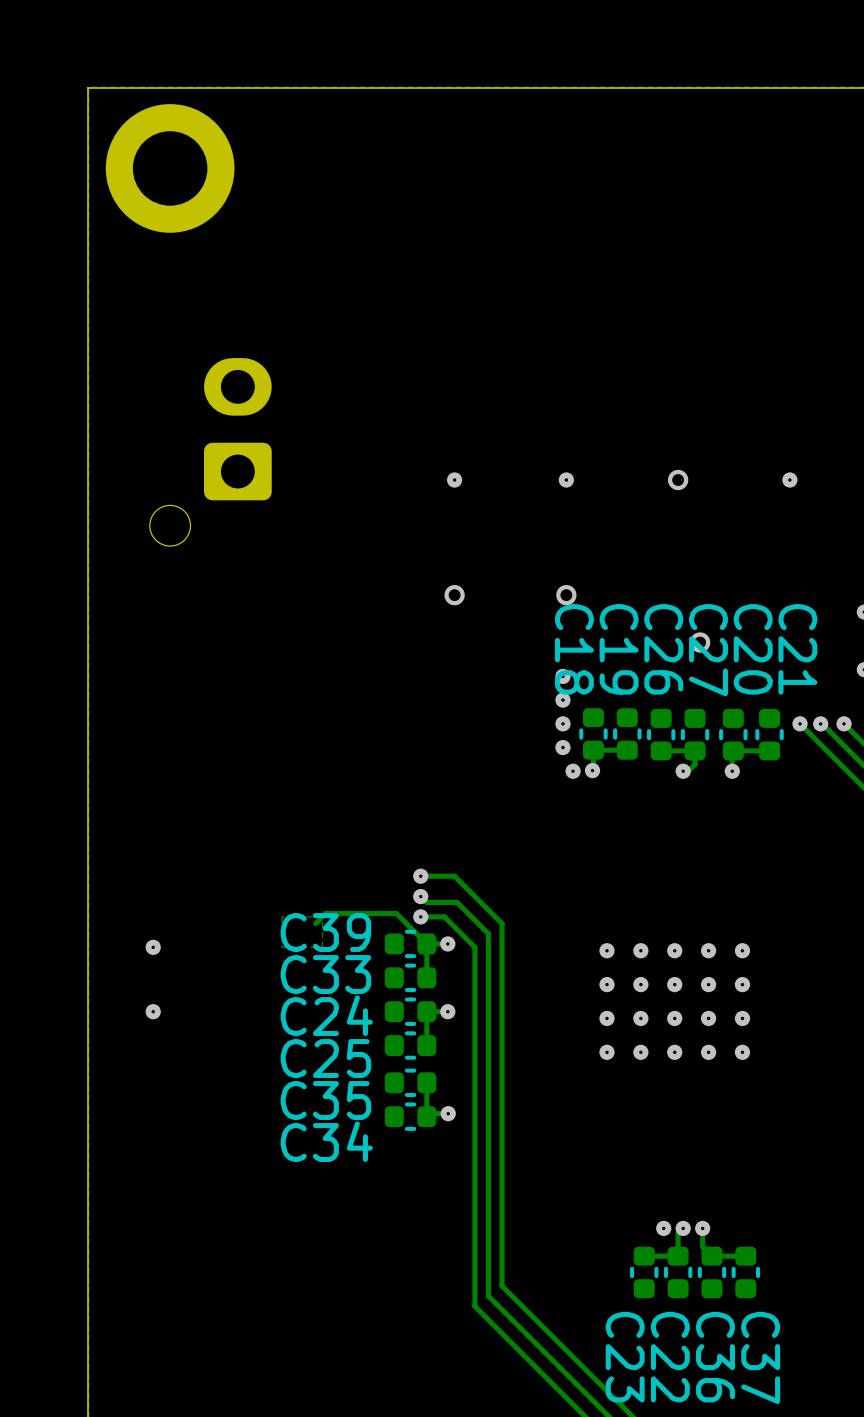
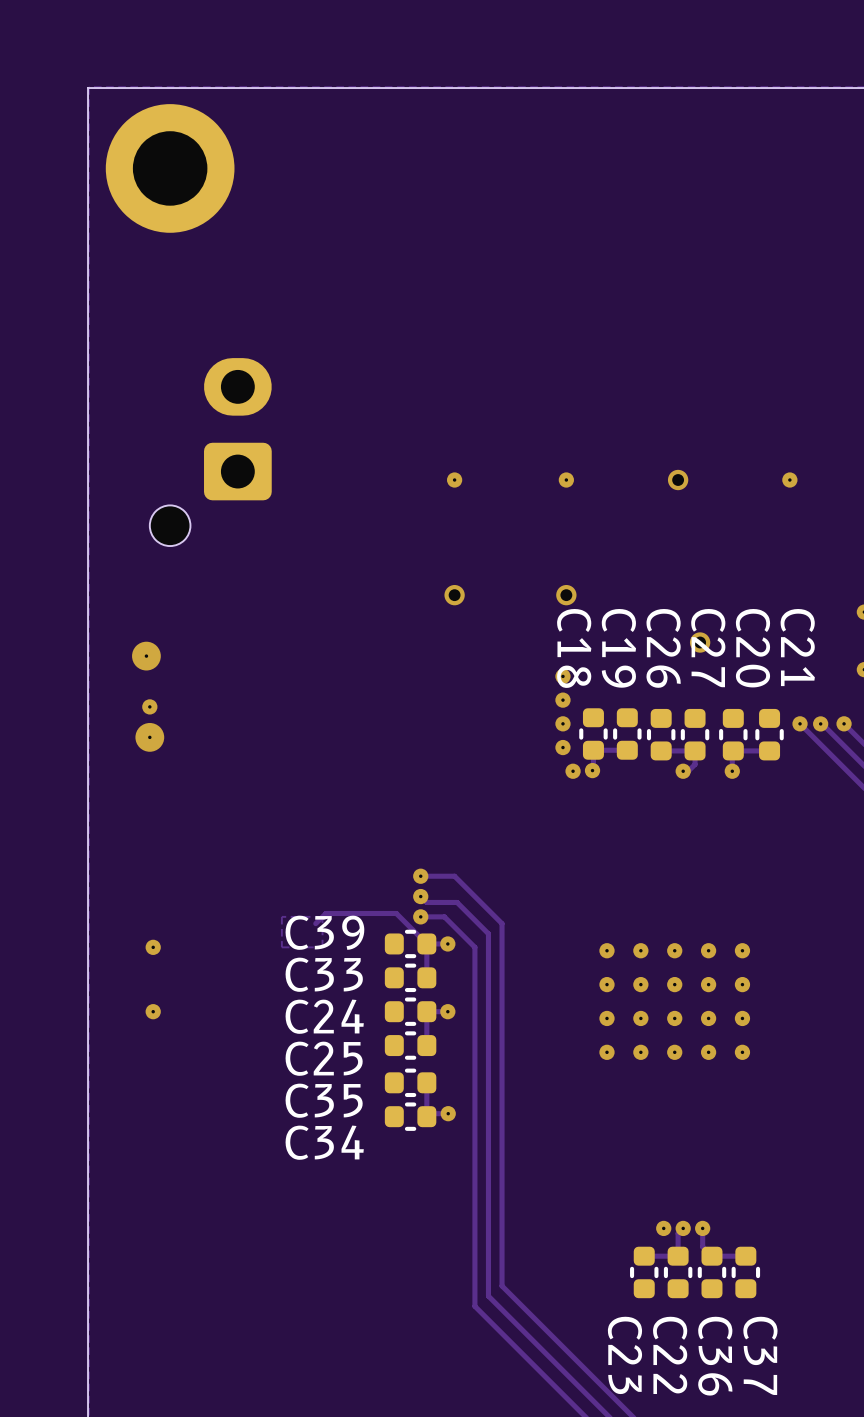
via: none -> (146, 656)
via: none -> (149, 706)
via: none -> (149, 737)

